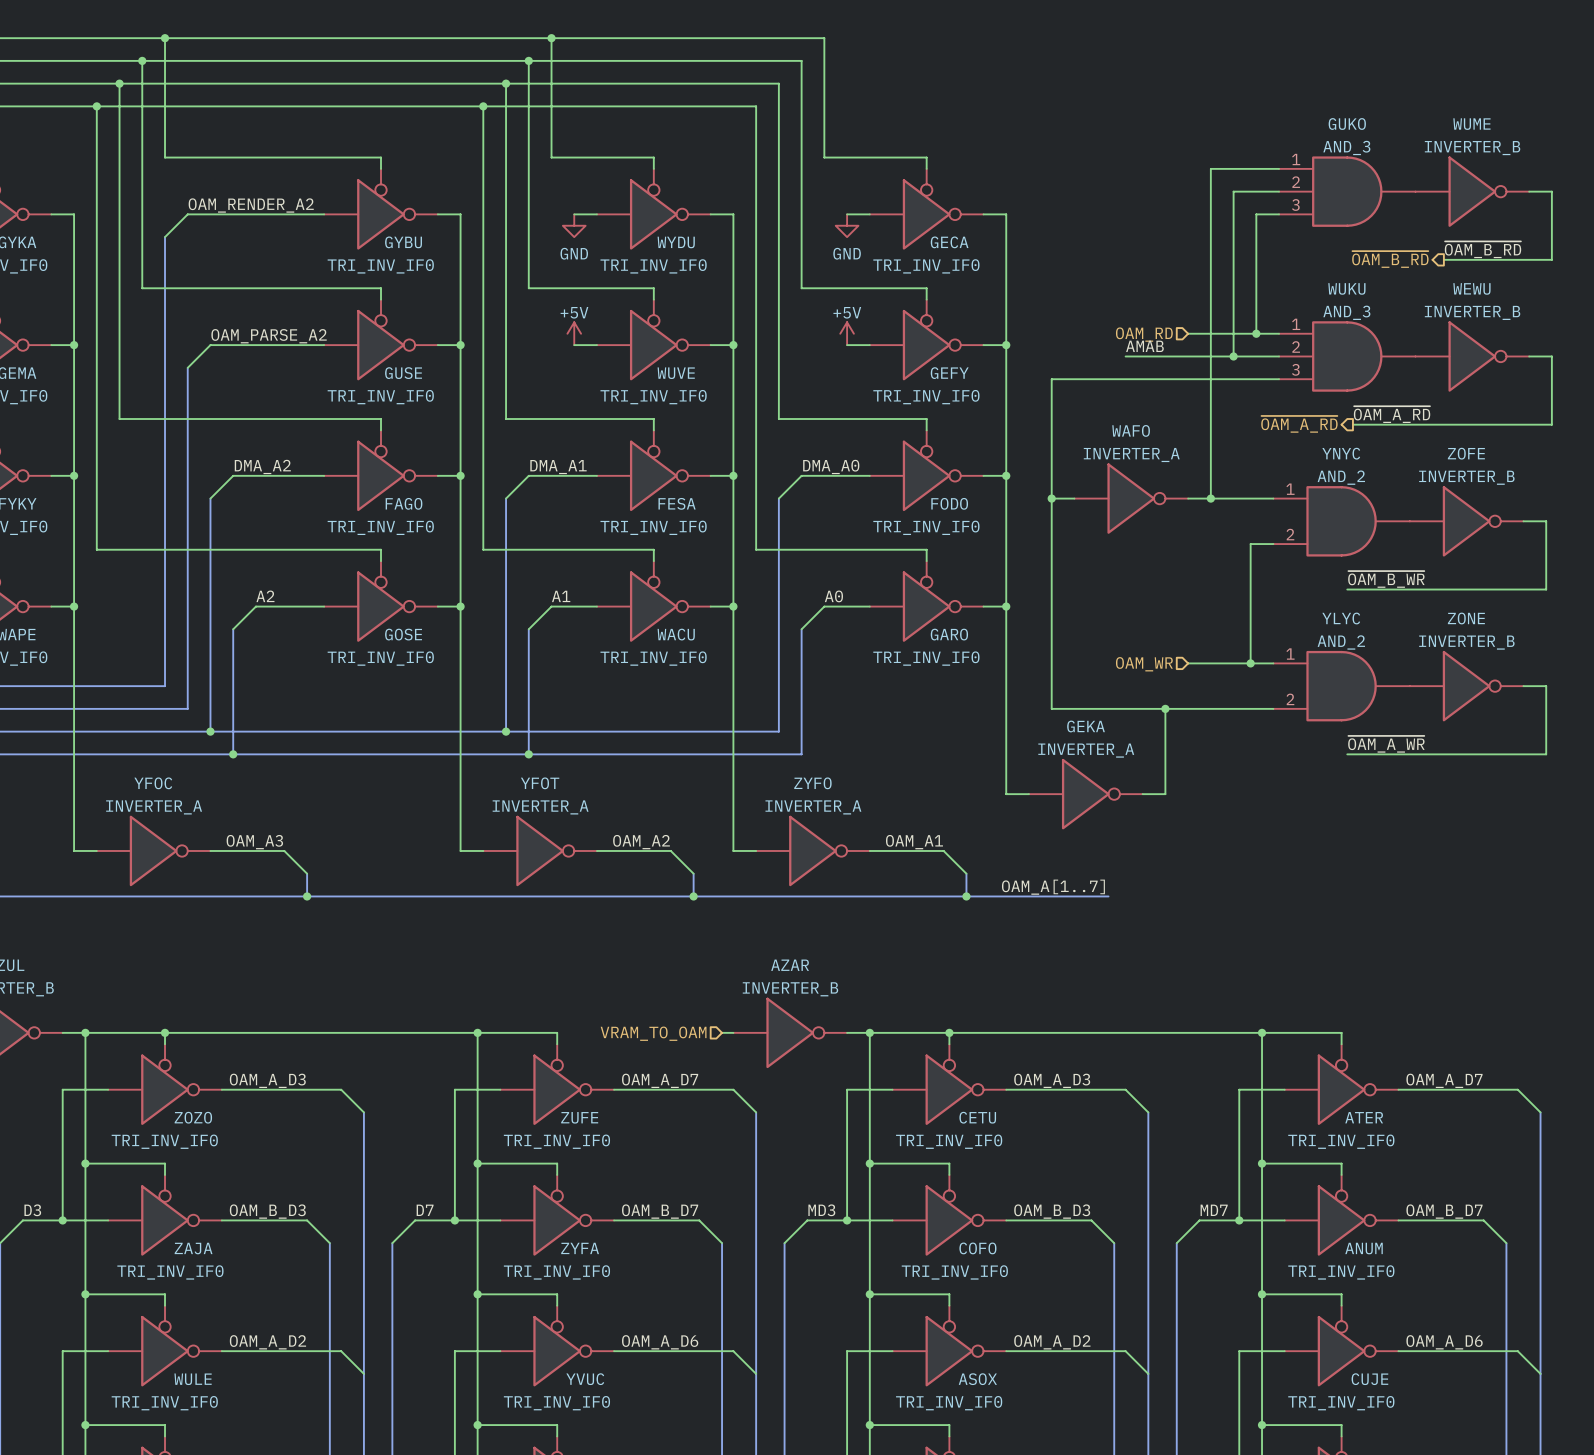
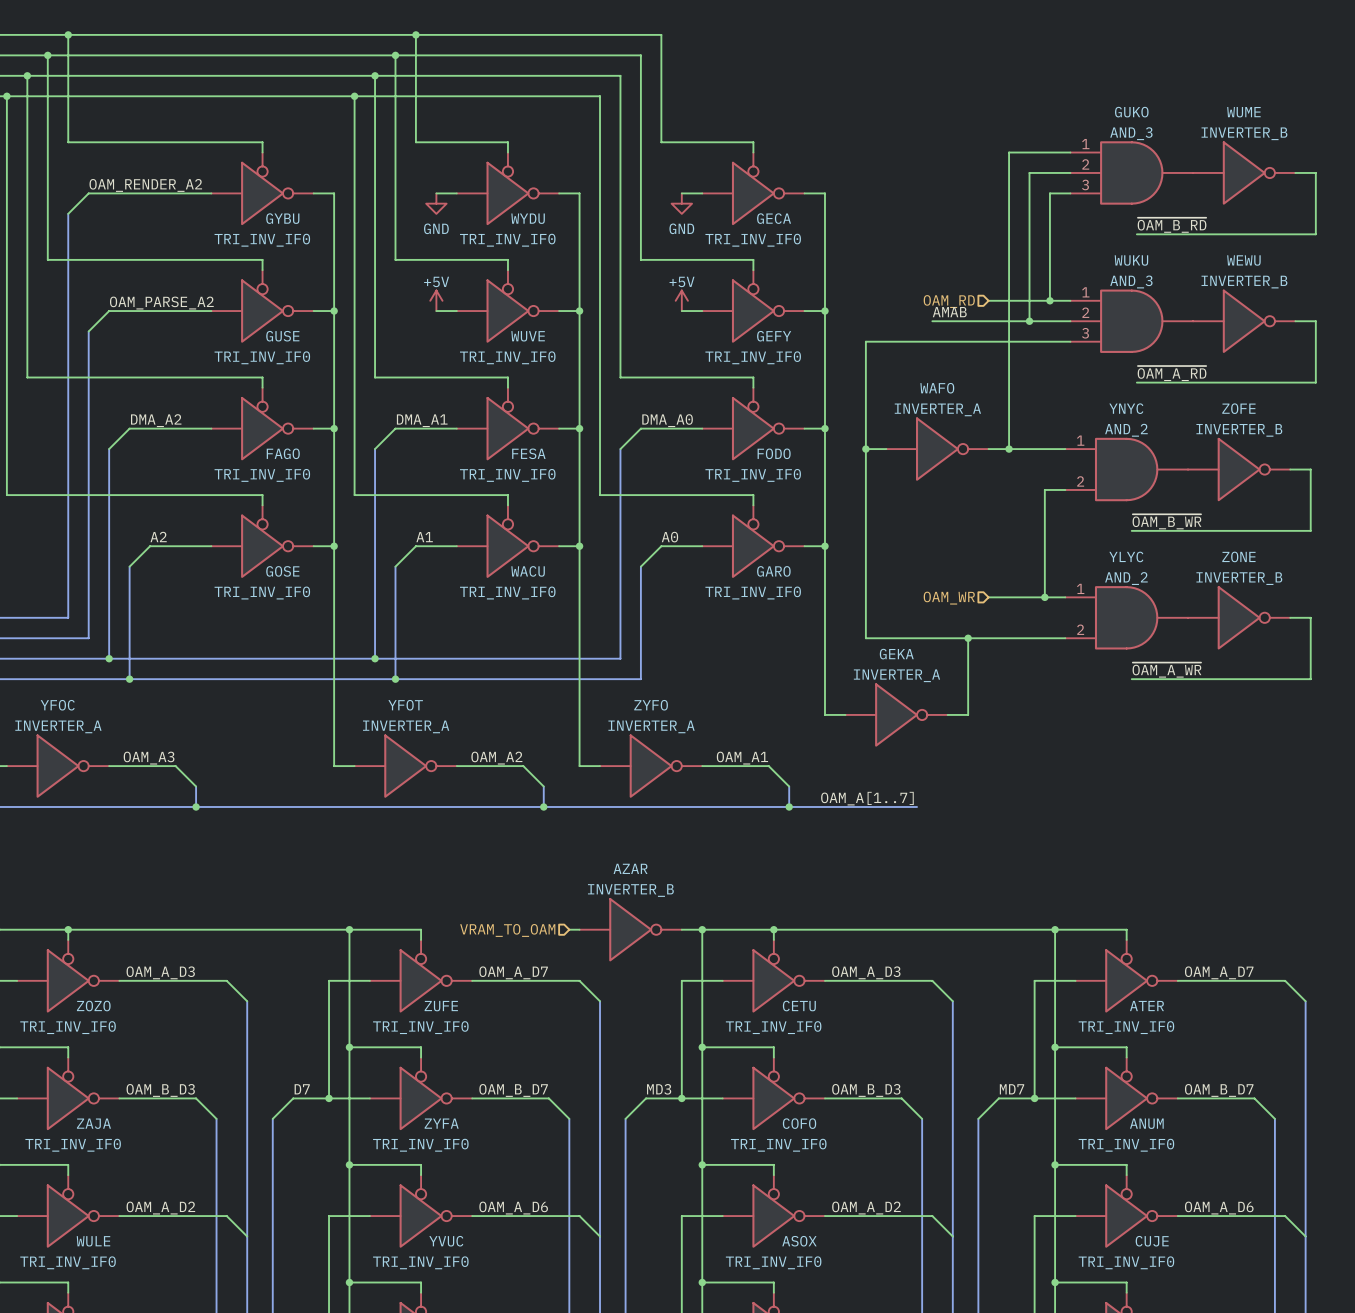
label position: ~{OAM_B_RD} (1482, 249) -> ~{OAM_B_RD} (1172, 225)
wire: none -> (1136, 234) (1218, 234)
hierarchical label: ~{OAM_B_RD} (1390, 259) -> none
hierarchical label: ~{OAM_A_RD} (1299, 424) -> none

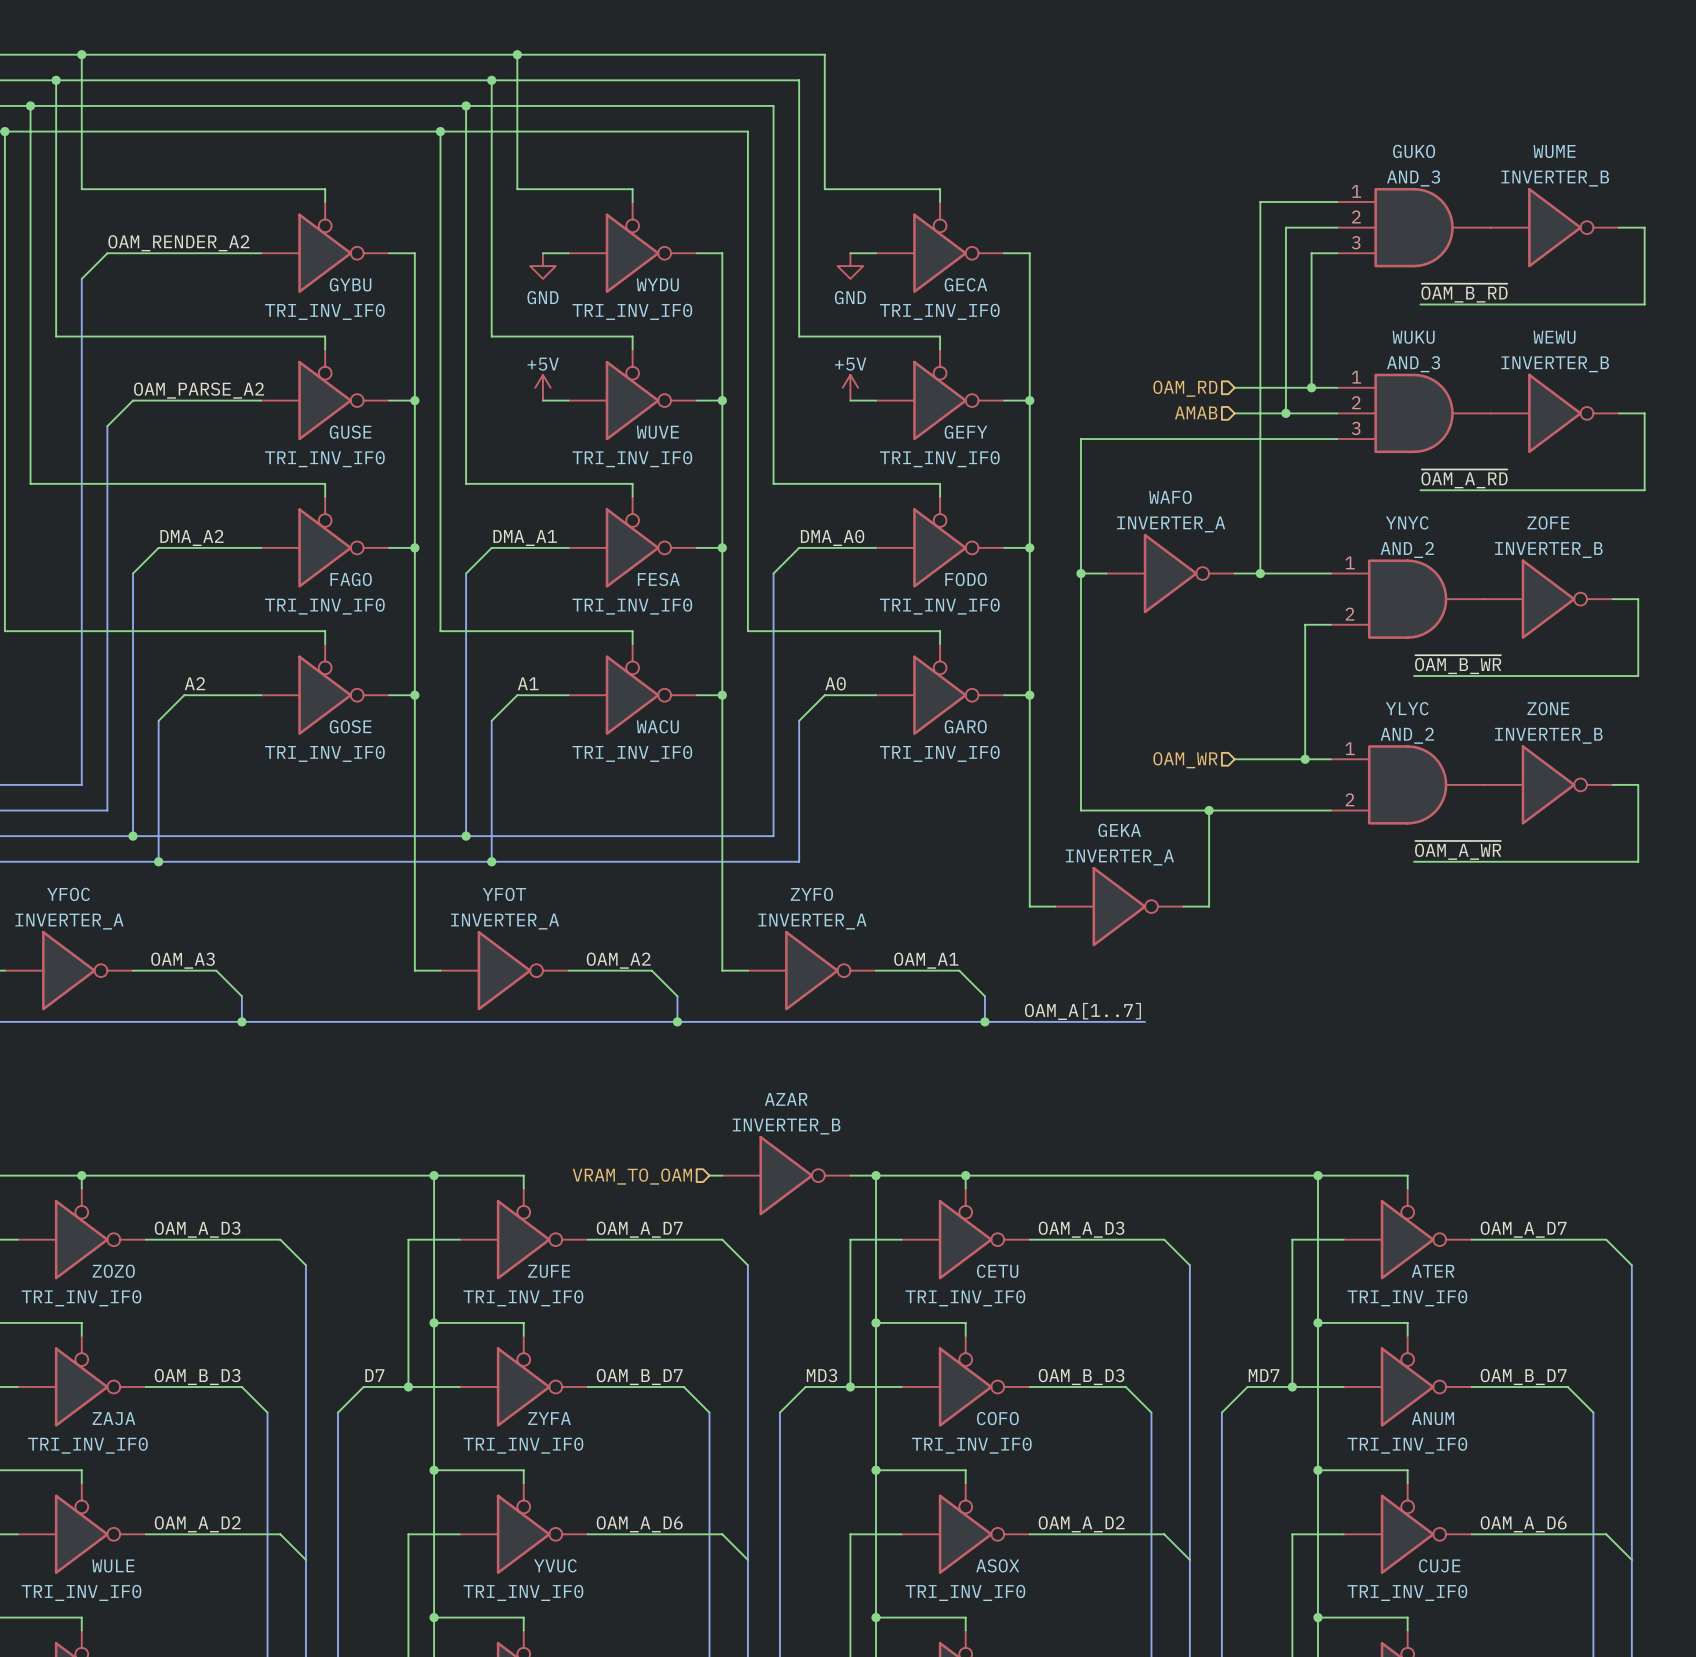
label: AMAB (949, 312) -> none
hierarchical label: none -> AMAB (1196, 412)
wire: (932, 321) (988, 321) -> none

